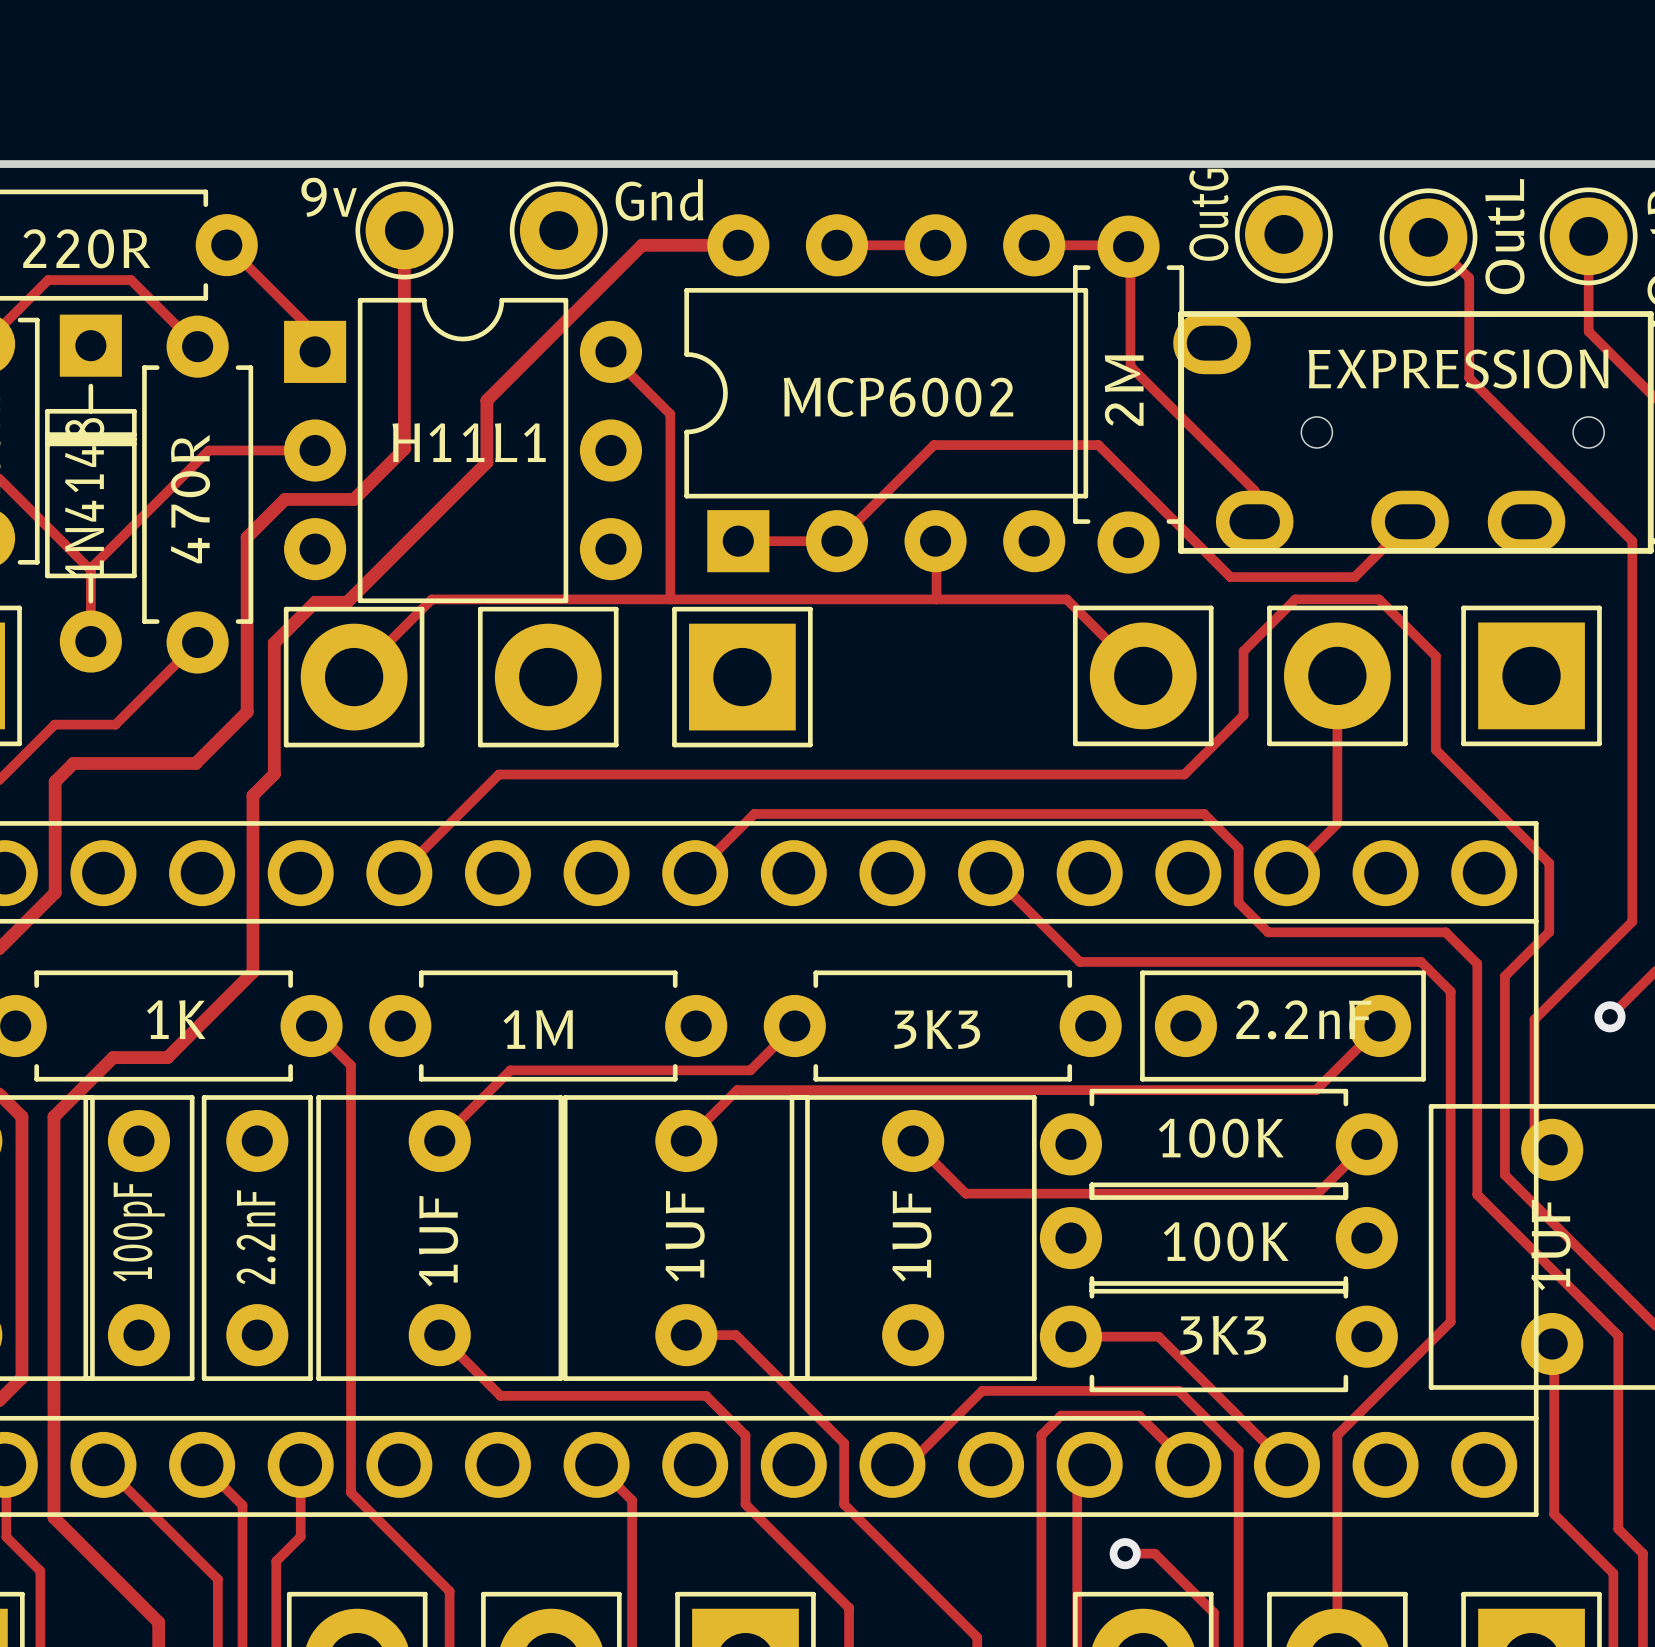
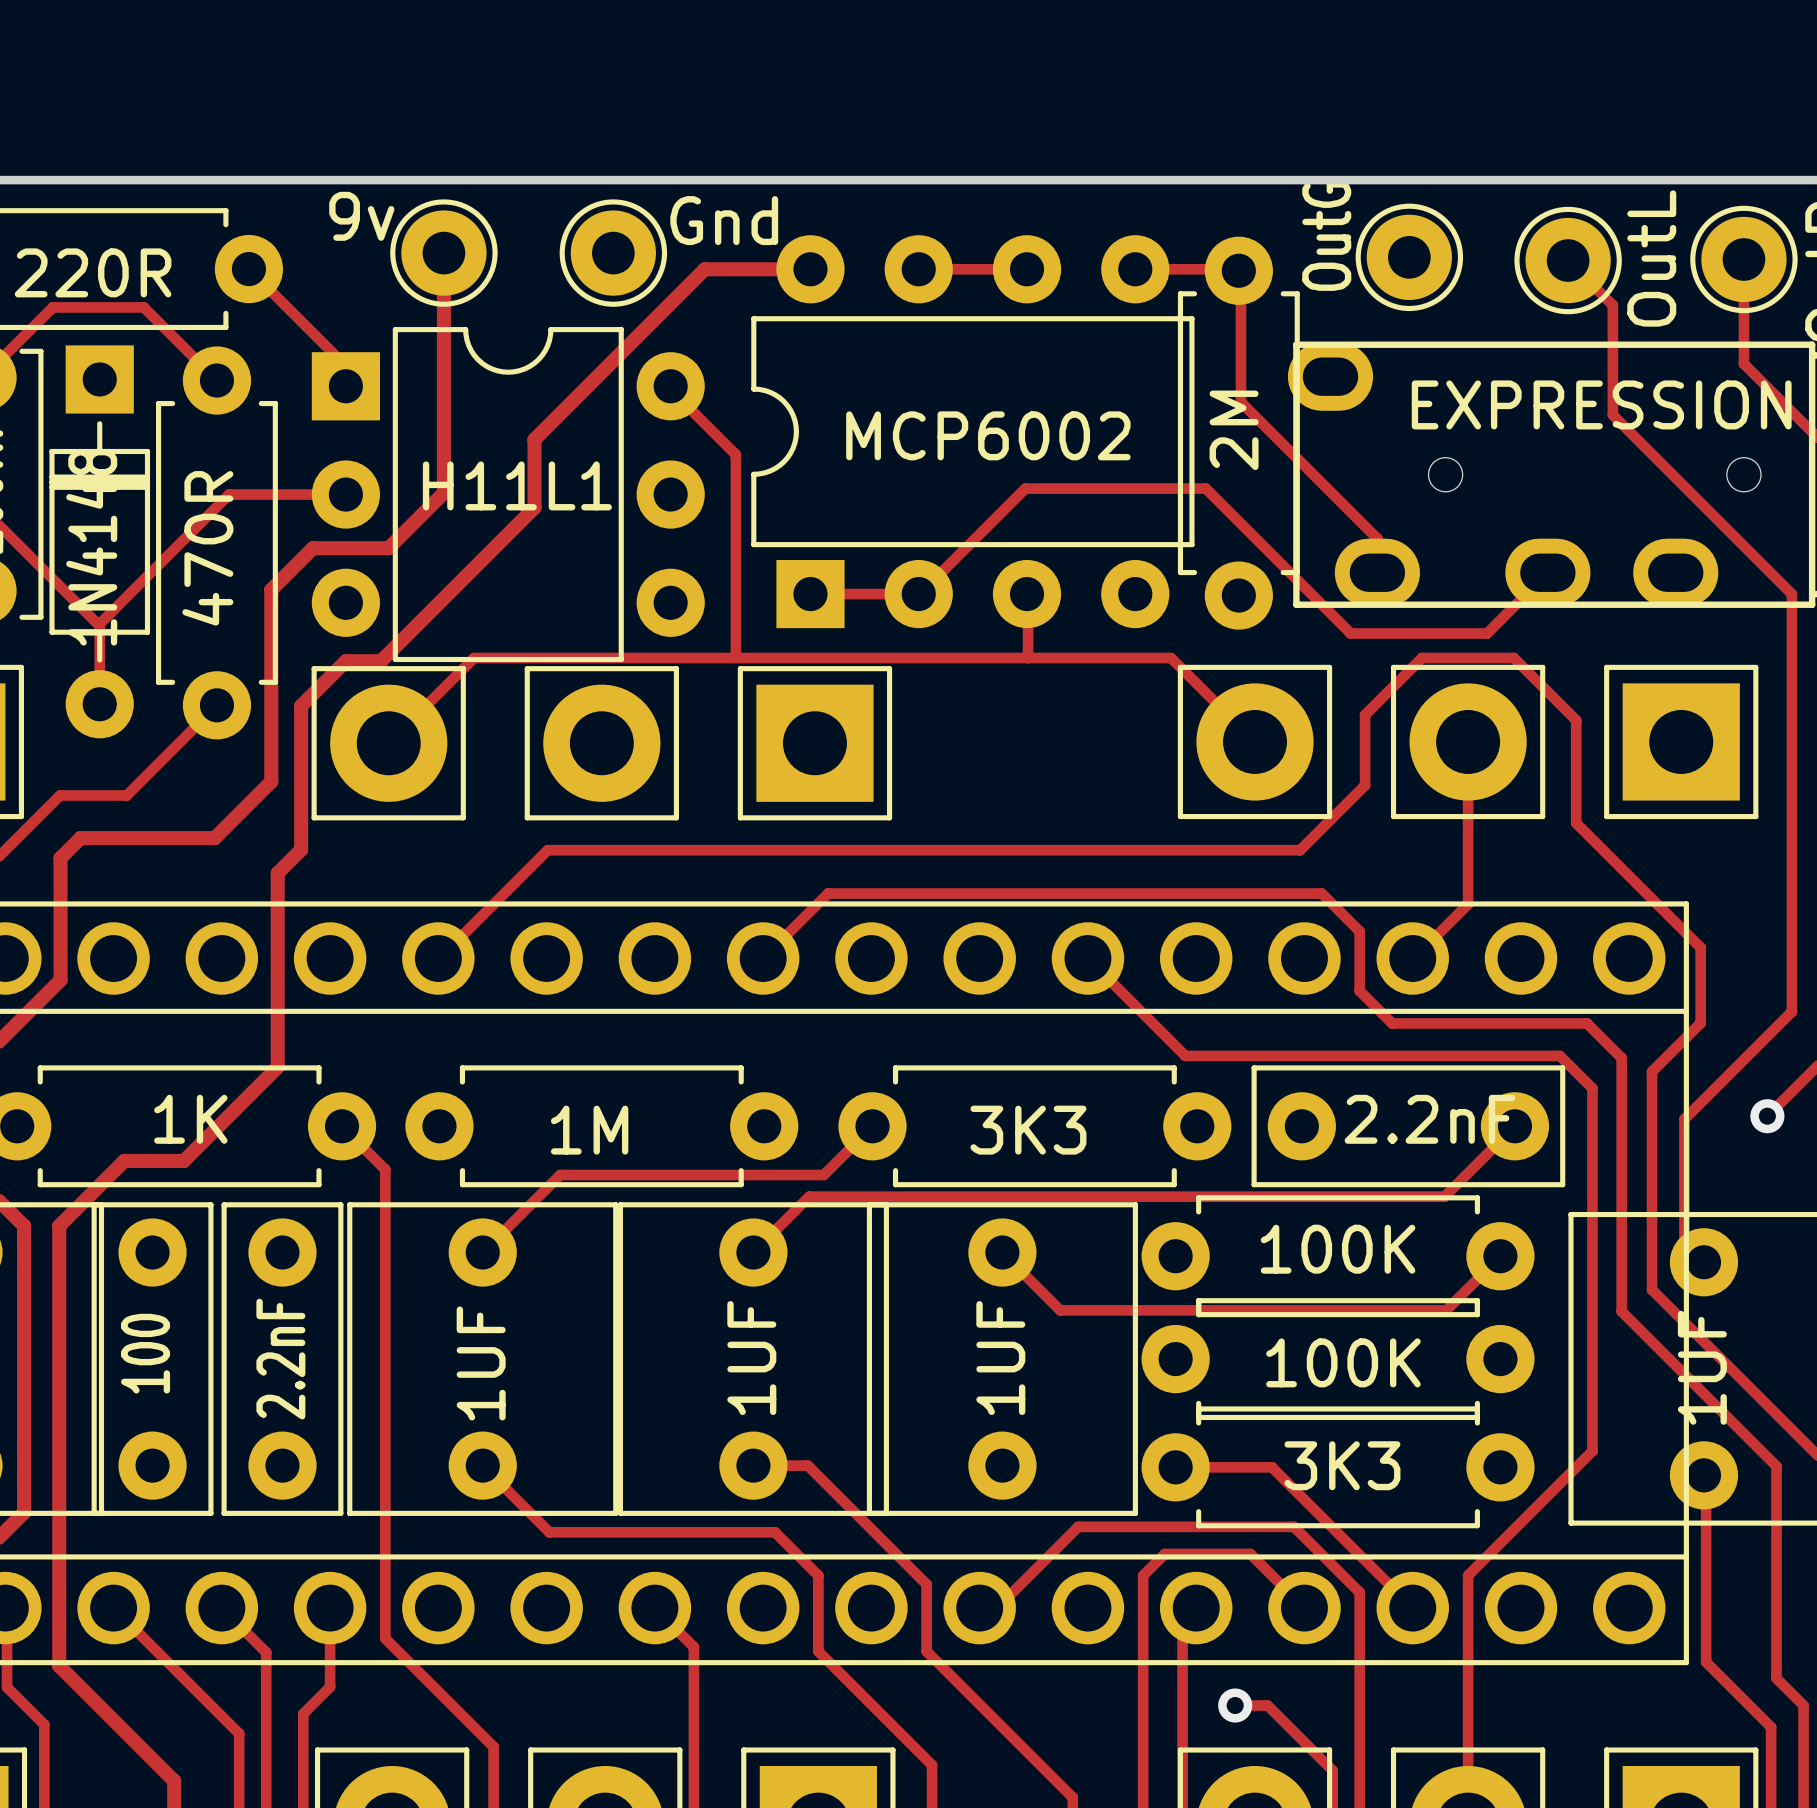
part value: 100pF (138, 1231) -> 100 (145, 1353)

